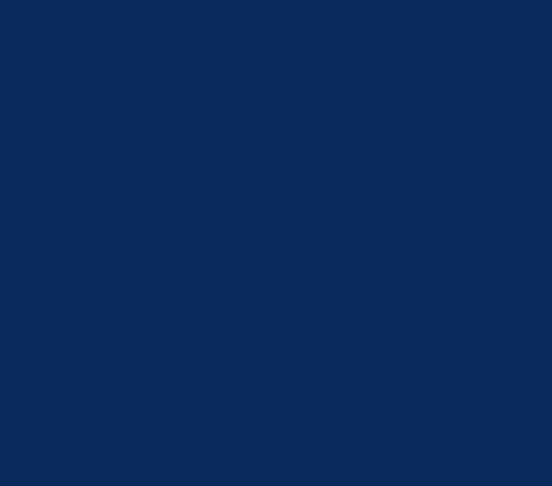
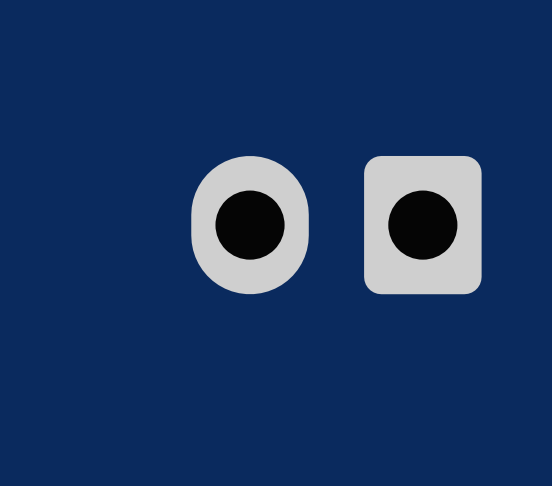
part: none -> (336, 225)

